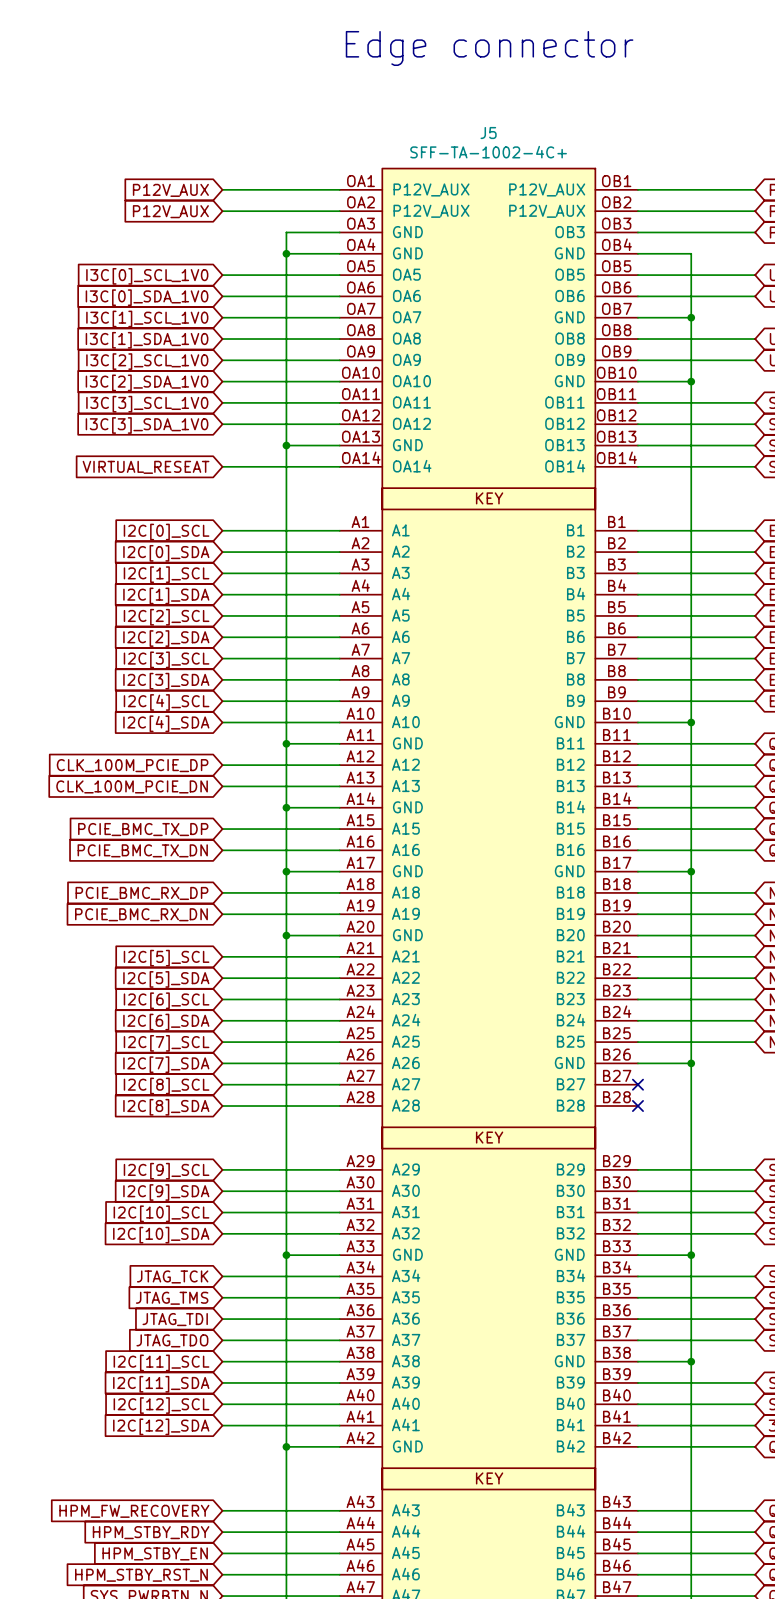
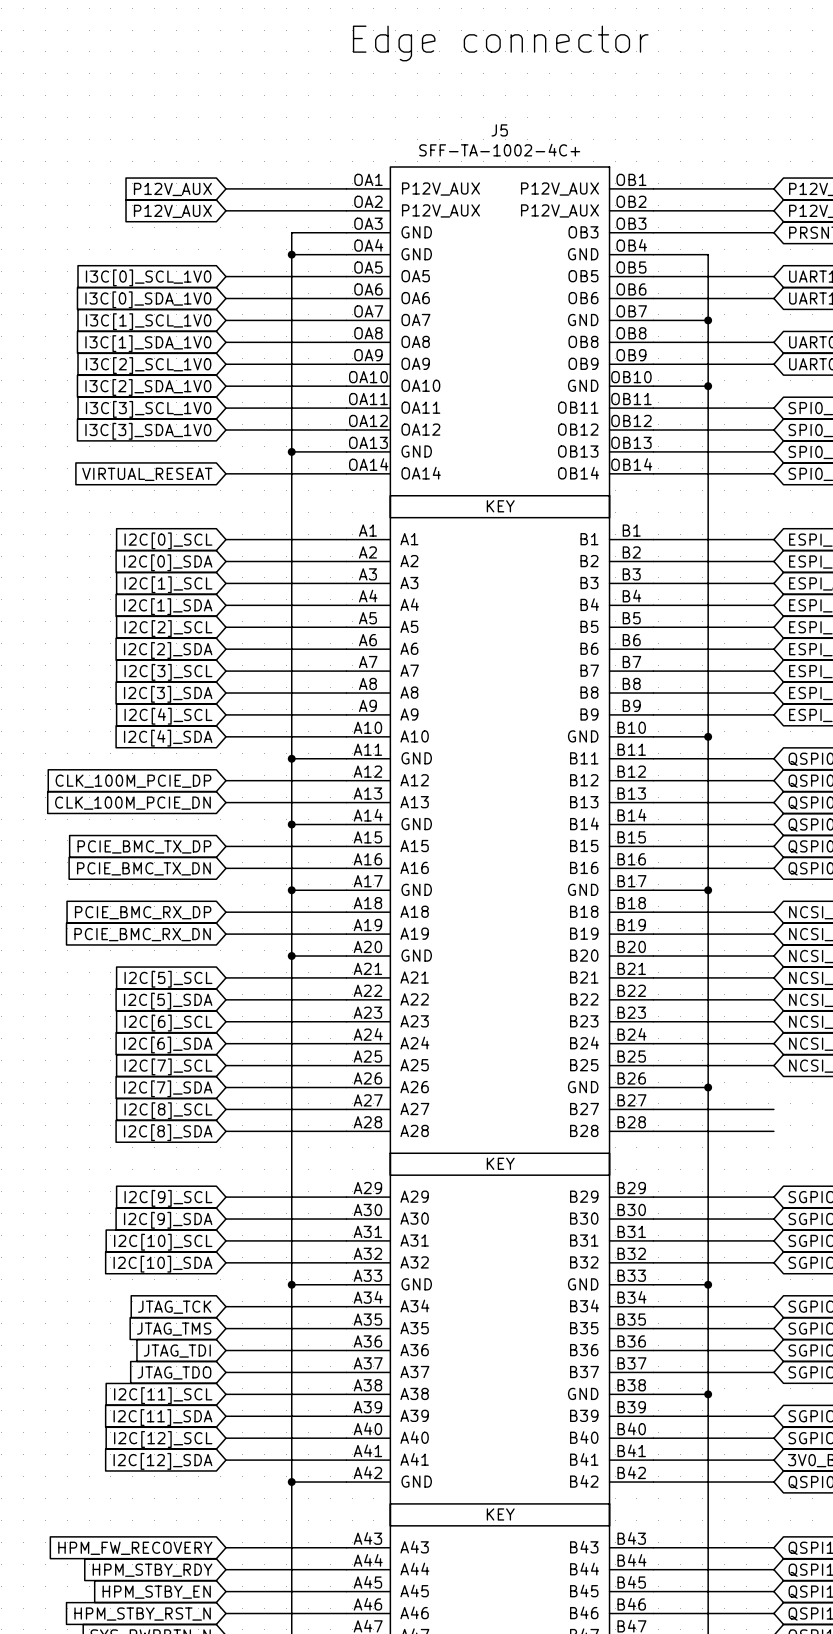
wire: none -> (653, 1109) (773, 1109)
no-connect mark: (637, 1084) -> none
wire: none -> (653, 1131) (773, 1131)
no-connect mark: (637, 1106) -> none

